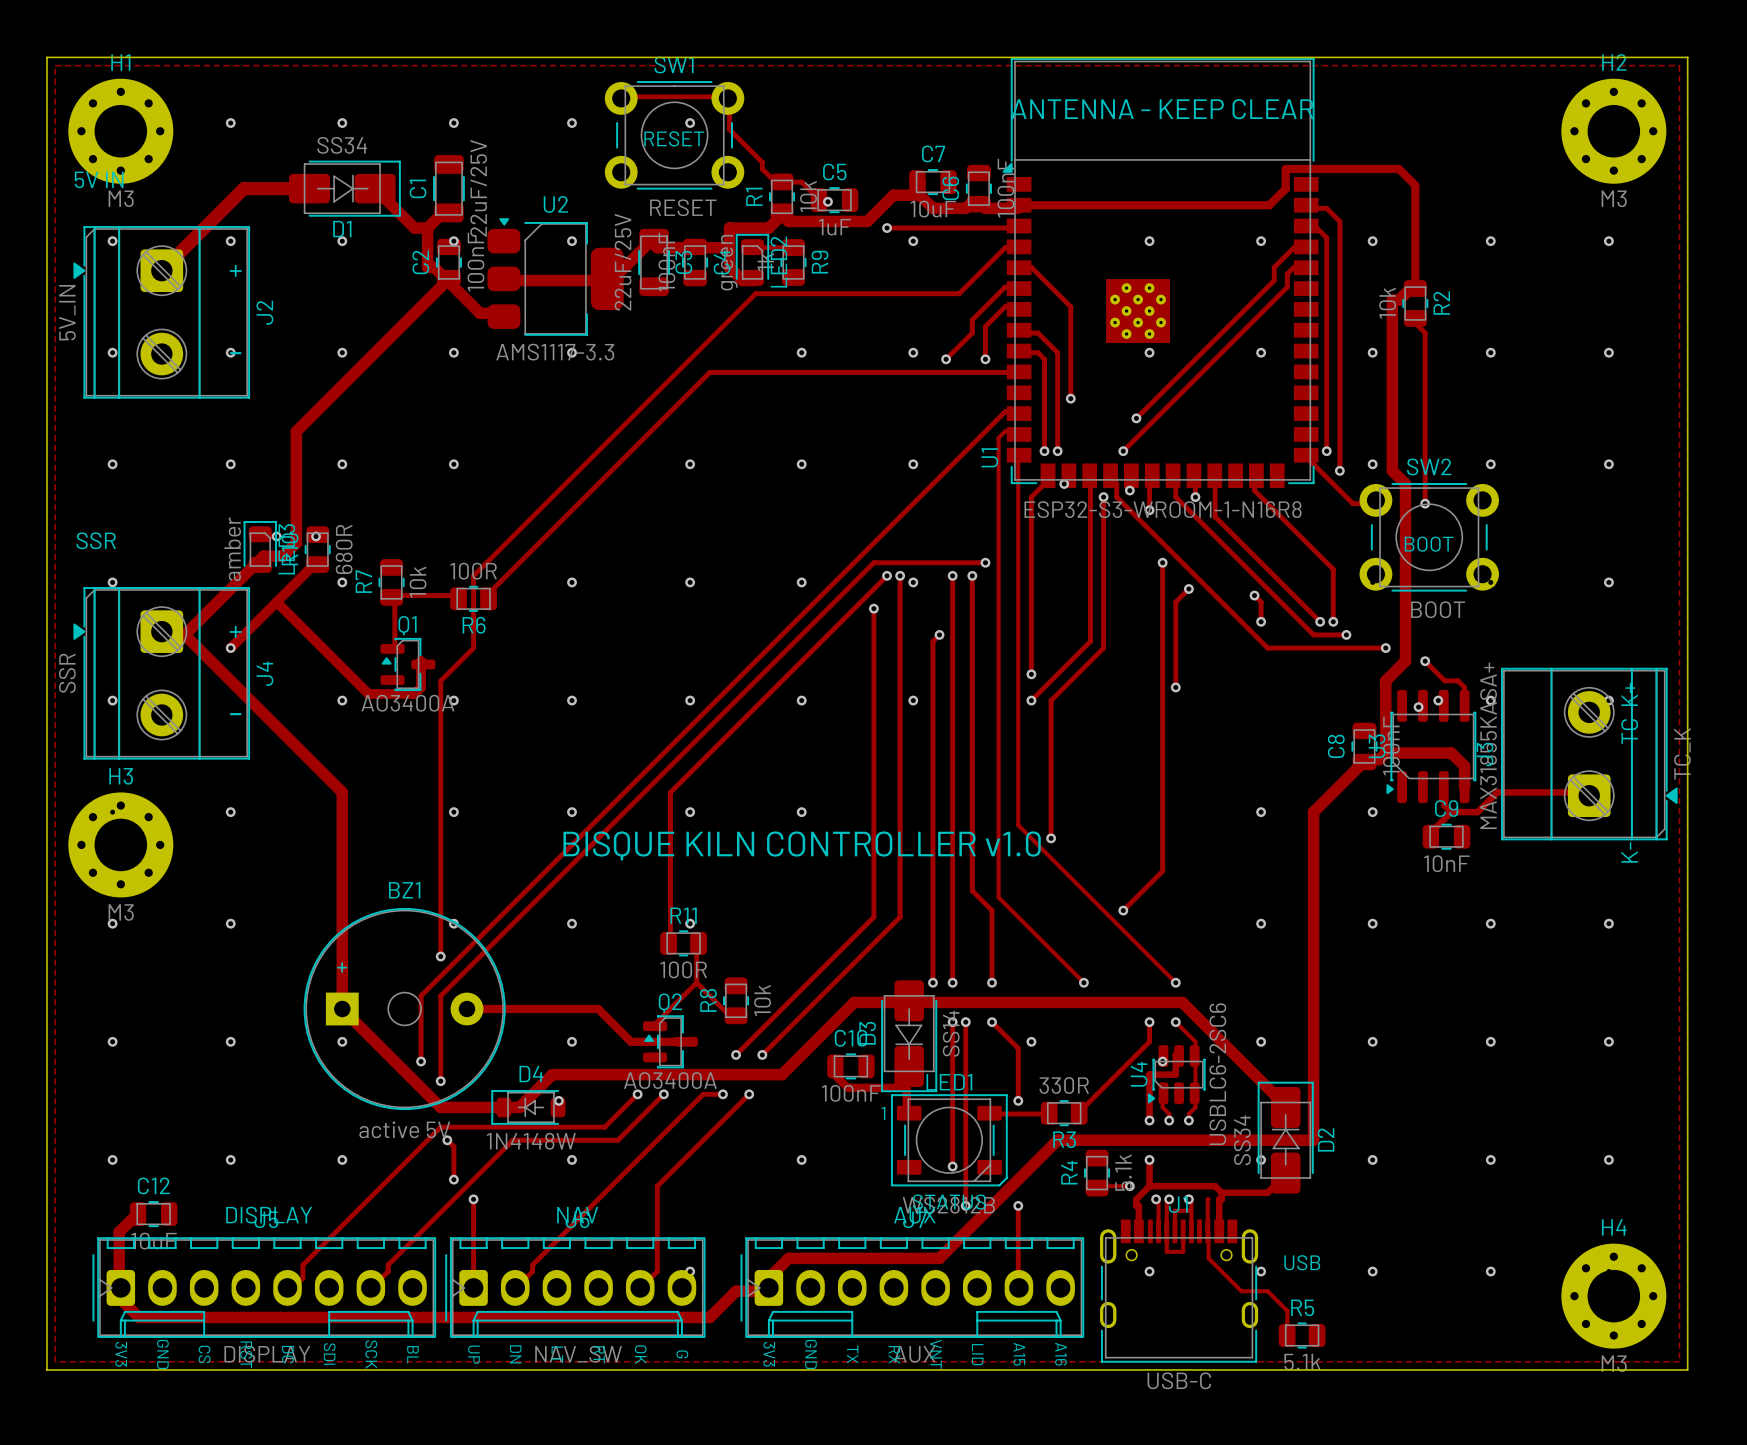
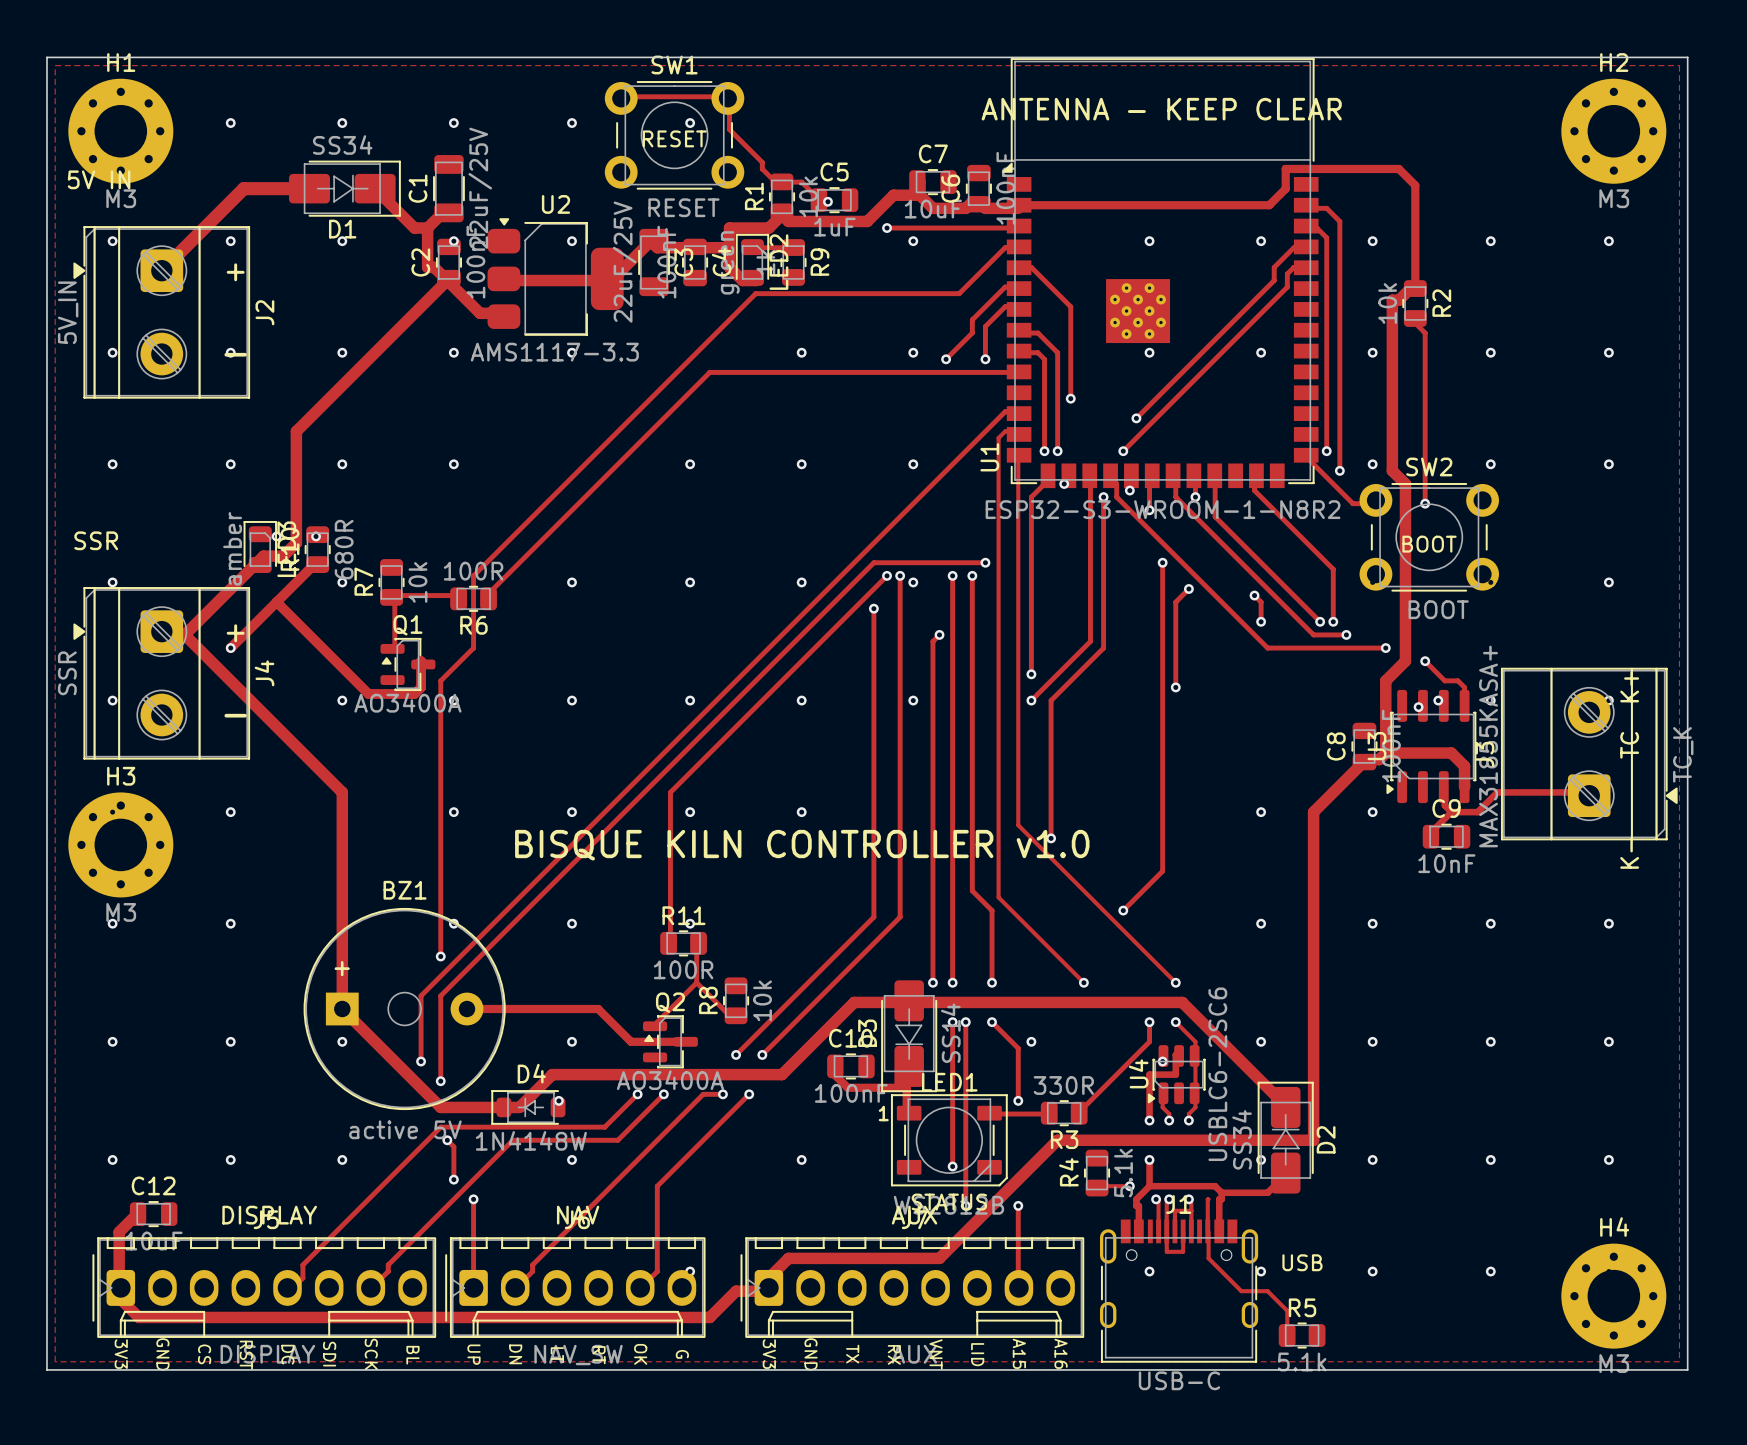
U1 value: ESP32-S3-WROOM-1-N16R8 (1163, 509) -> ESP32-S3-WROOM-1-N8R2 (1163, 509)

